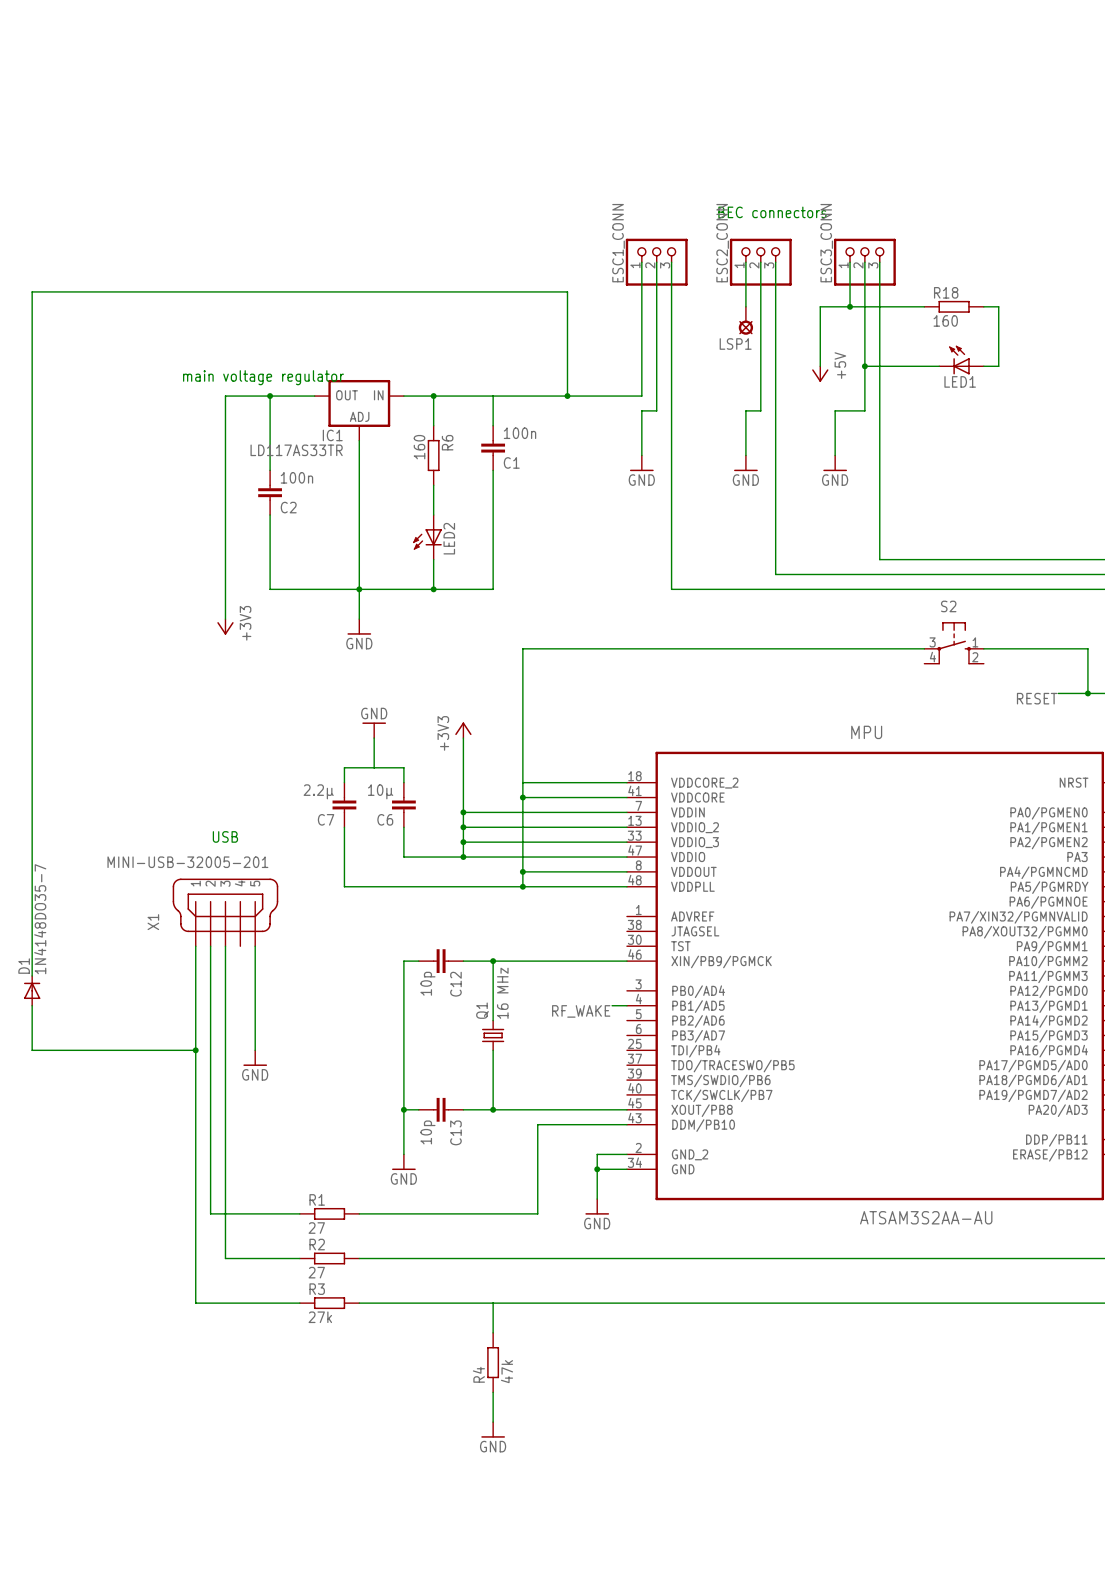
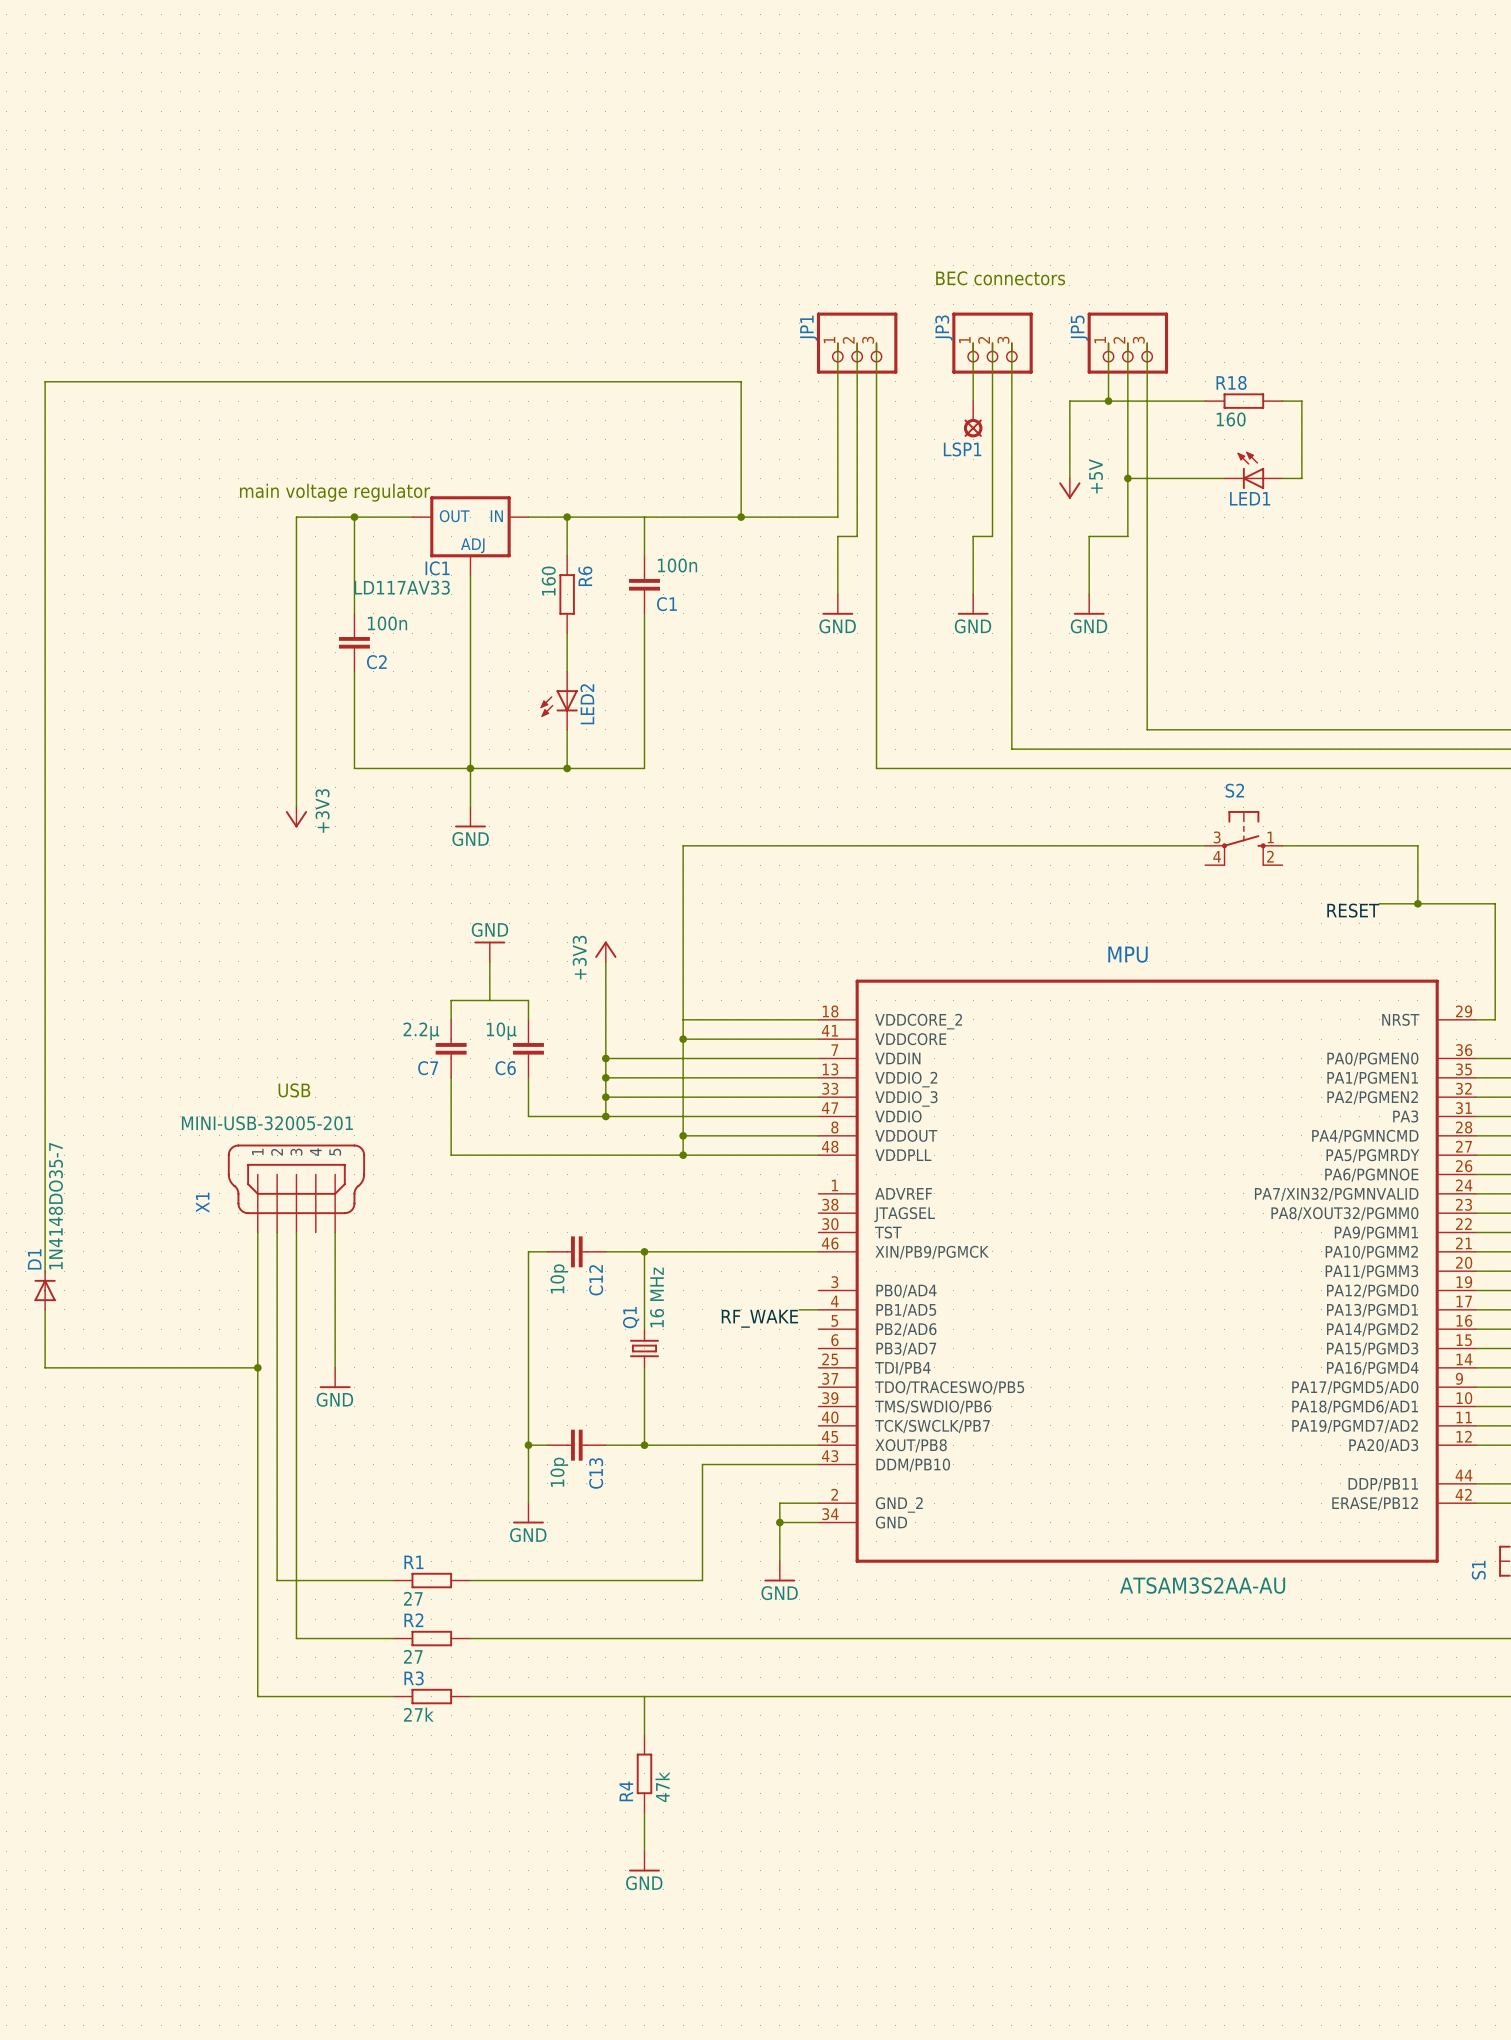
ESC1_CONN: (656, 262) -> none
JP1: none -> (857, 343)
ESC2_CONN: (760, 262) -> none
JP3: none -> (992, 343)
ESC3_CONN: (864, 262) -> none
JP5: none -> (1127, 343)
IC1 value: LD117AS33TR (296, 450) -> LD117AV33 (402, 587)

